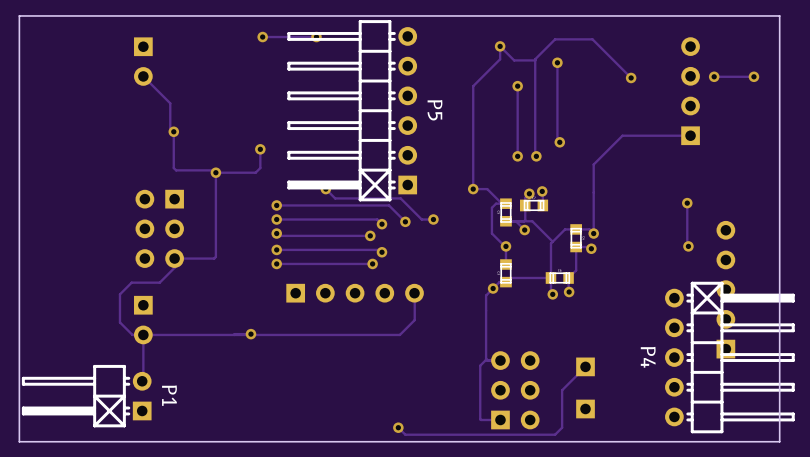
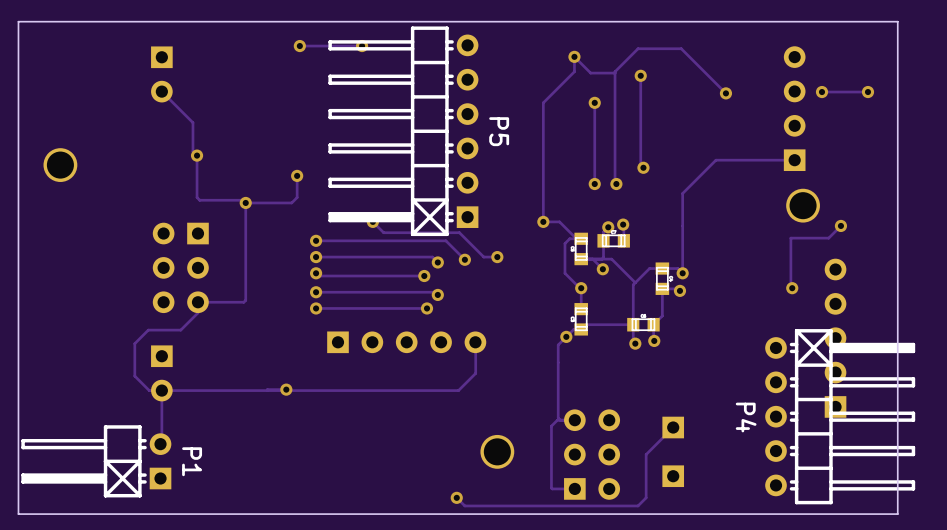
part: none -> (60, 165)
part: none -> (803, 205)
track: none -> (840, 225) (828, 238) (790, 238)
via position: (687, 203) -> (840, 225)
part: none -> (497, 451)

